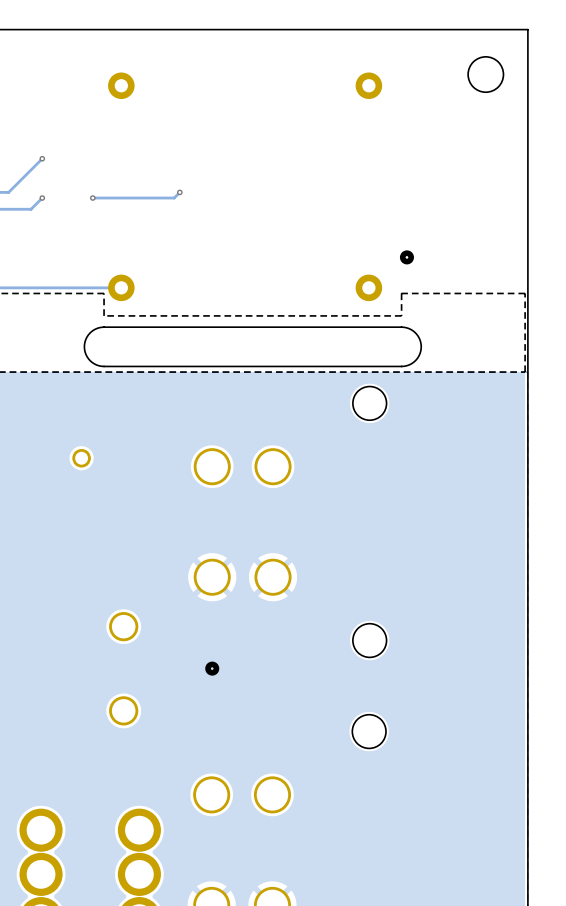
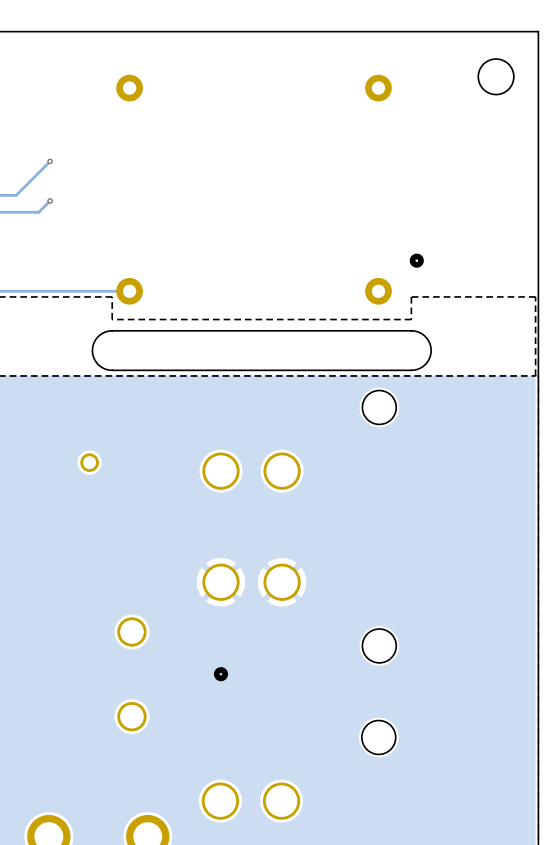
track: (179, 192) (174, 198) (92, 198) -> none
via: (179, 192) -> none
via: (92, 198) -> none

